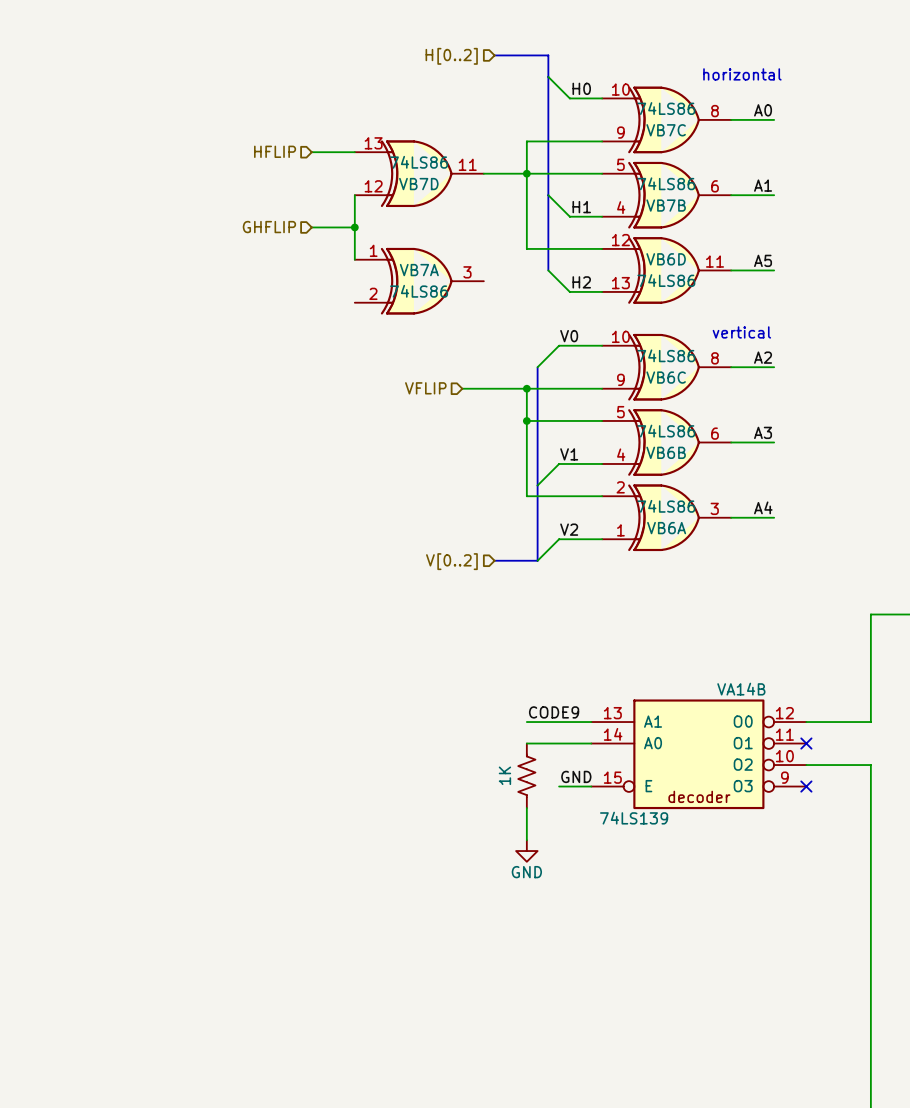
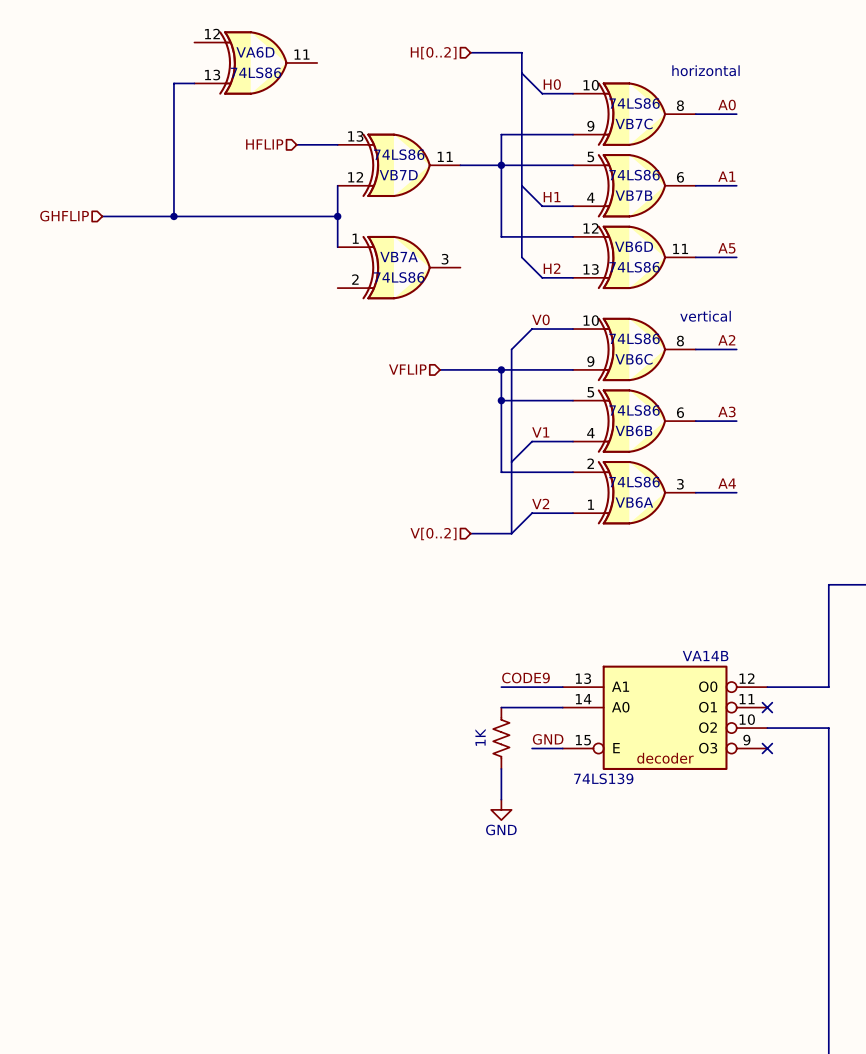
VA6D: none -> 74LS86 (255, 62)
wire: none -> (194, 83) (173, 83) (173, 216)
wire: none -> (102, 216) (296, 216)
junction: none -> (173, 216)
hierarchical label position: GHFLIP (269, 227) -> GHFLIP (64, 216)

